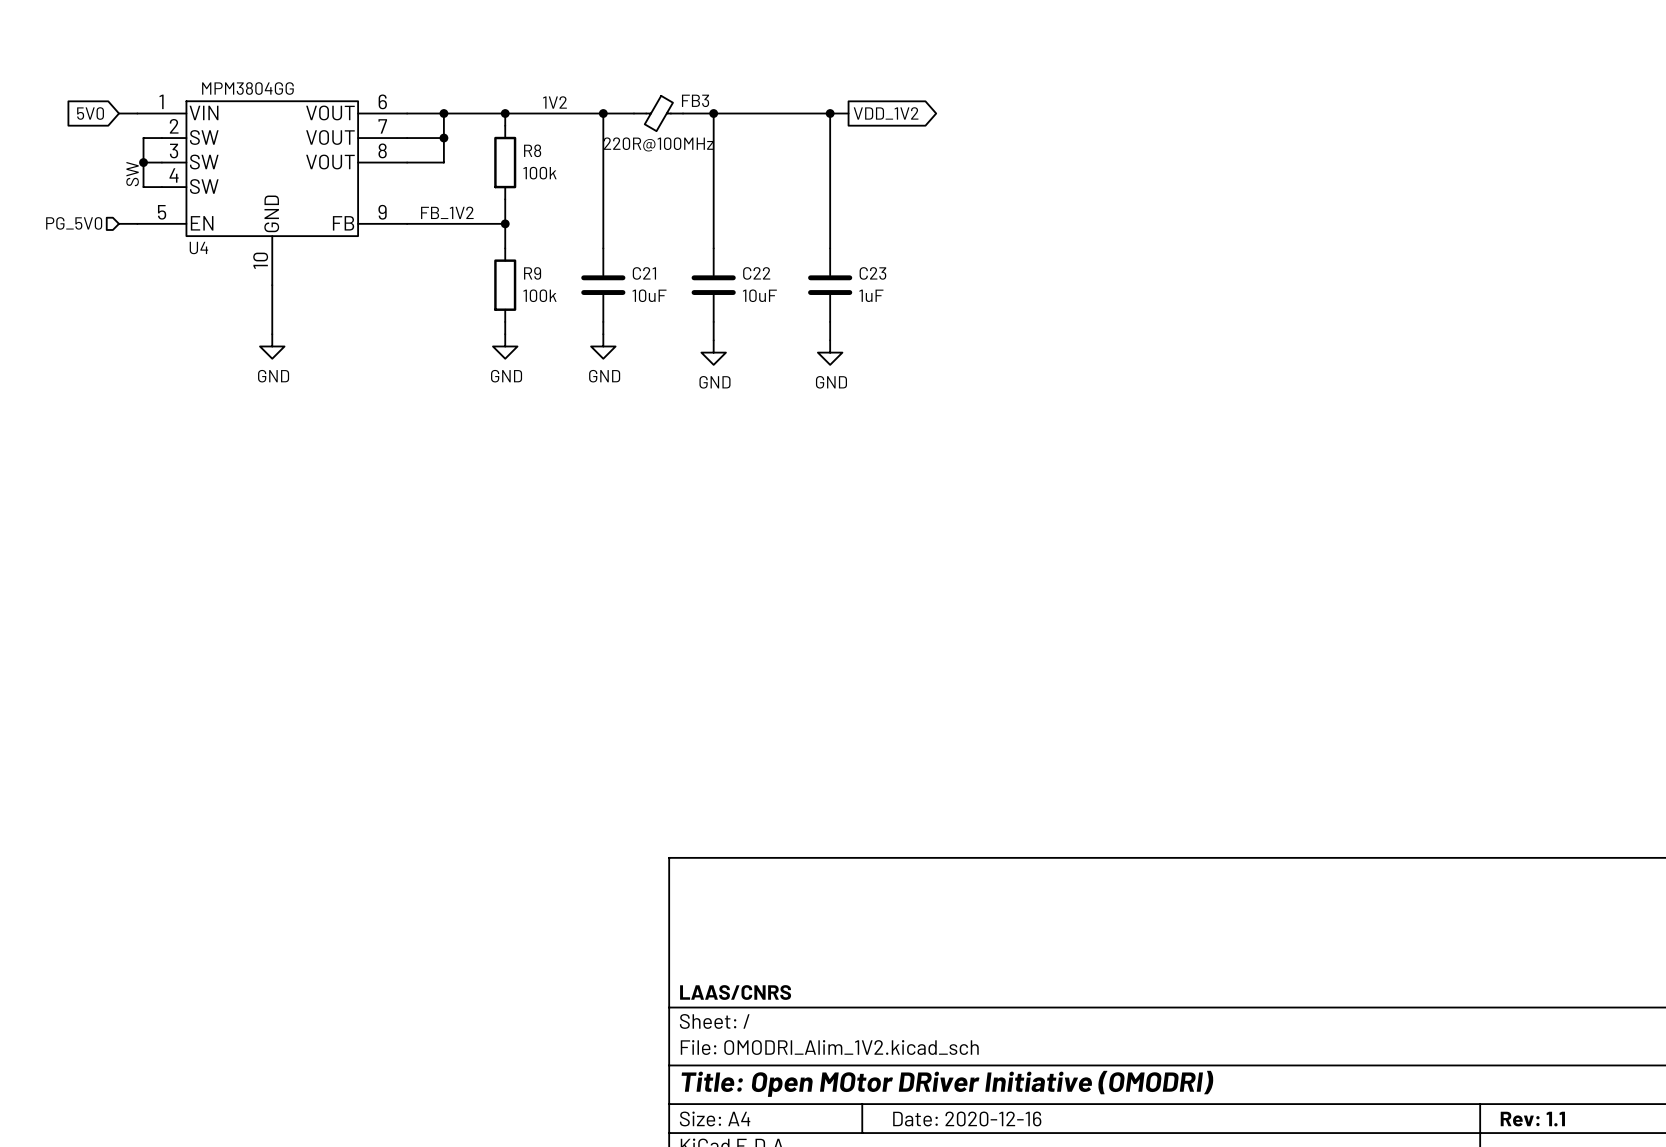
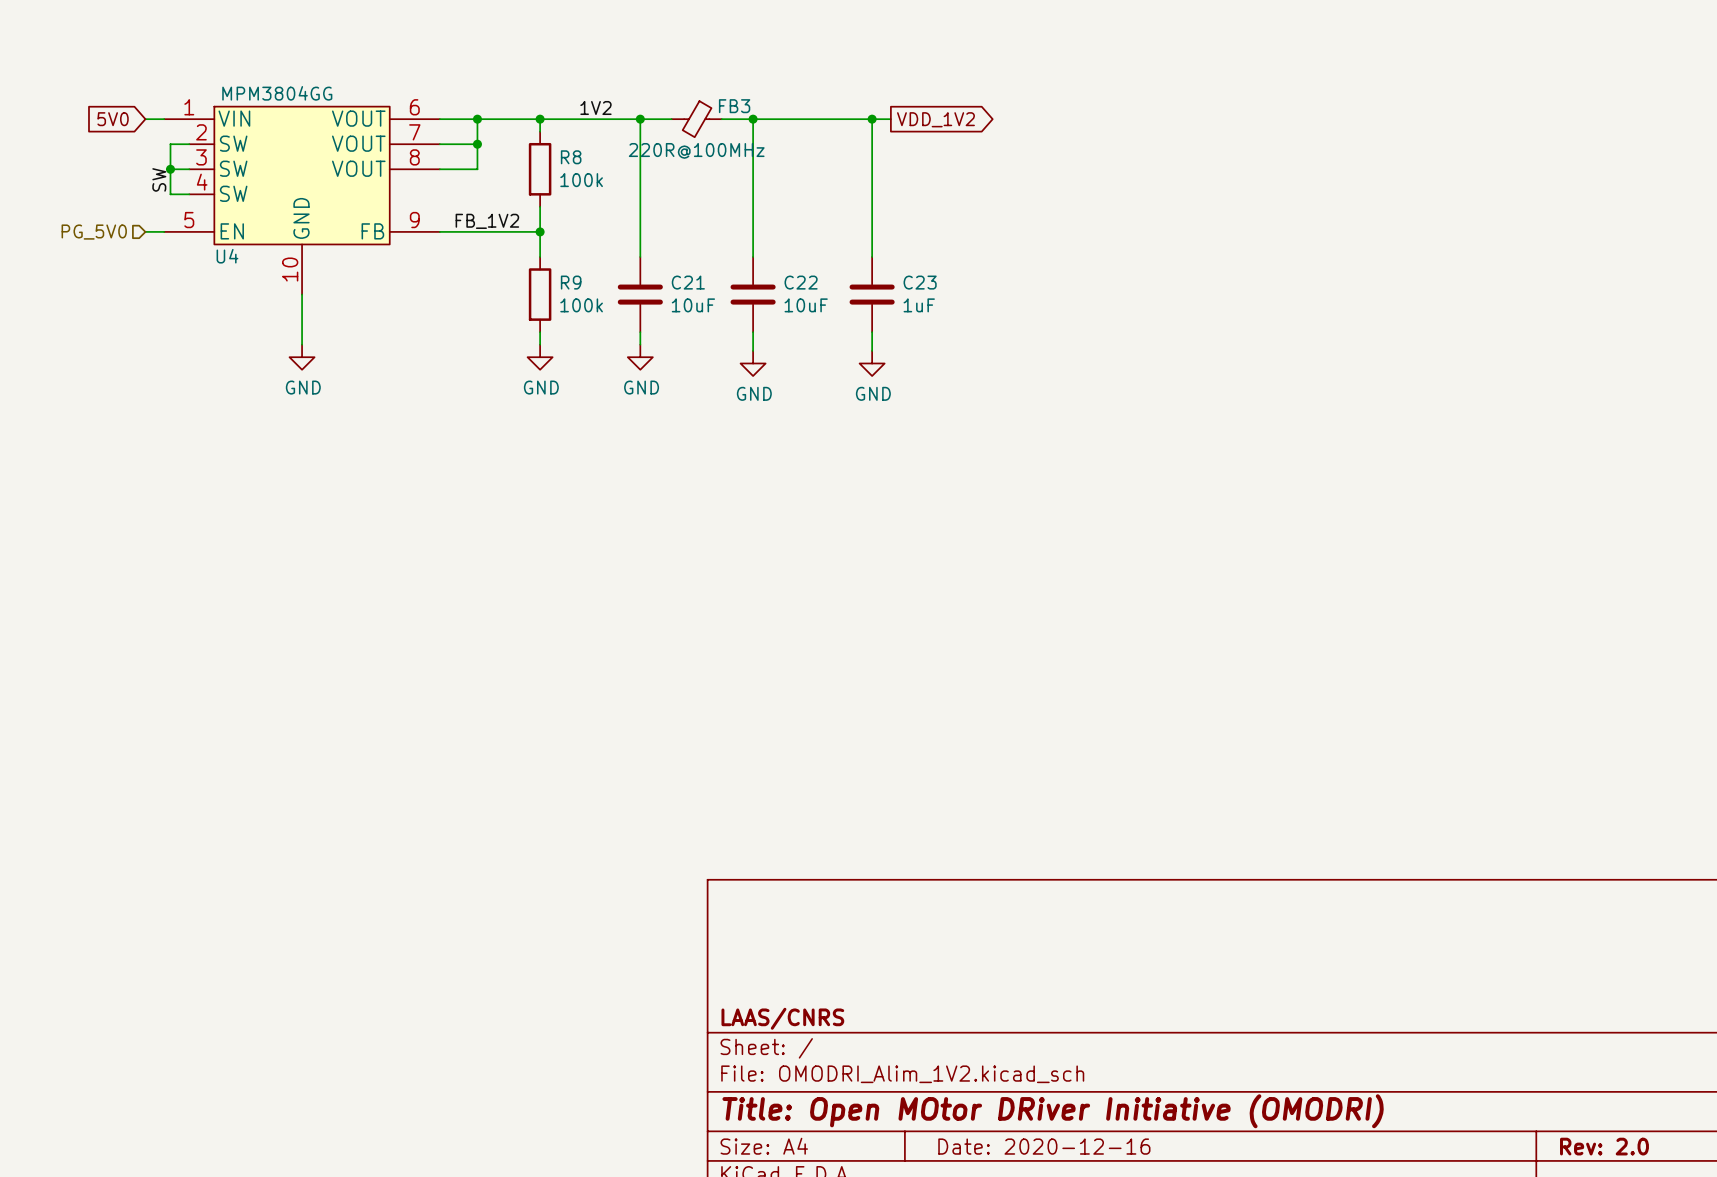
title block: Rev: 1.1 (1532, 1119) -> Rev: 2.0 (1604, 1146)

